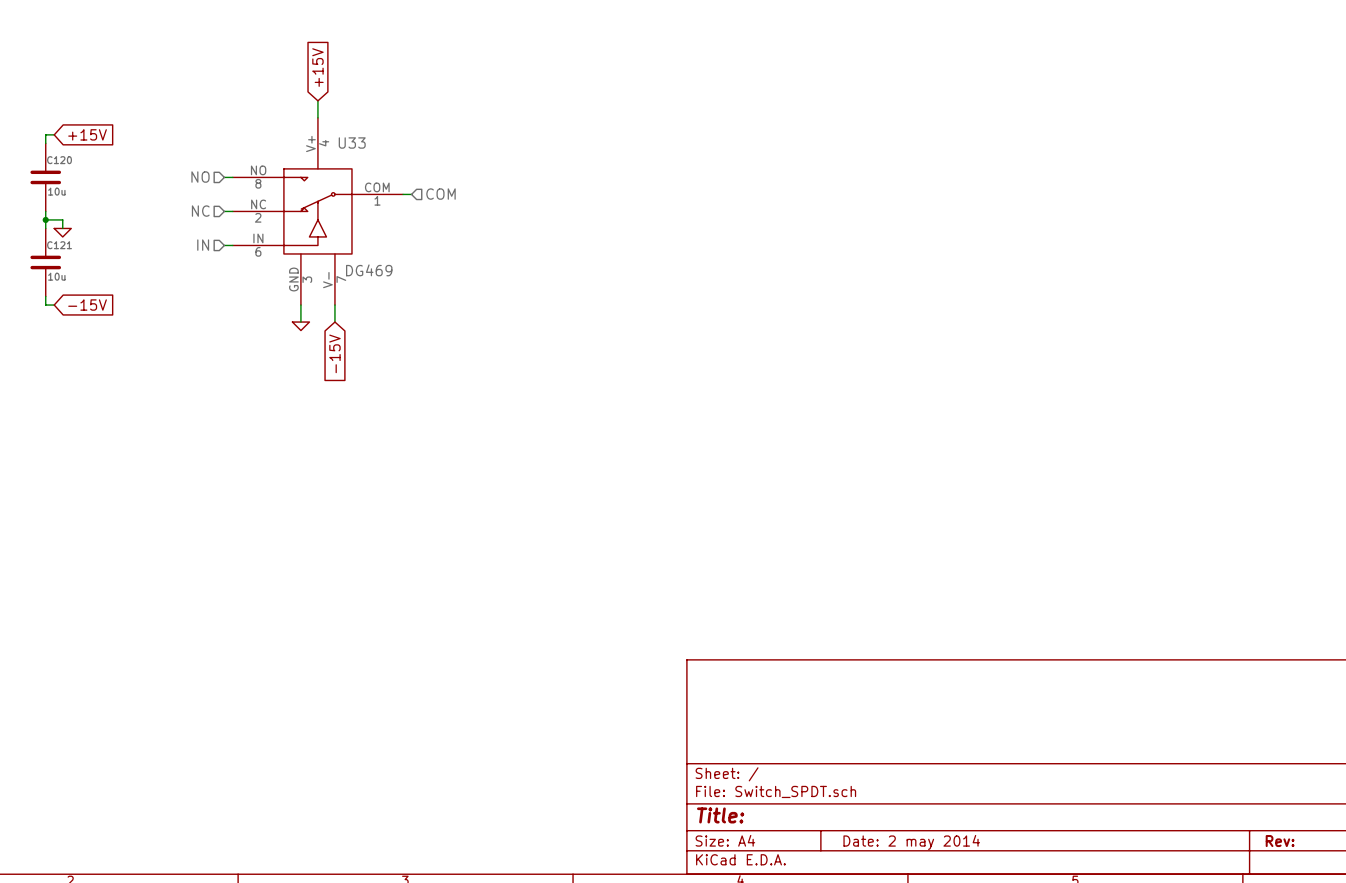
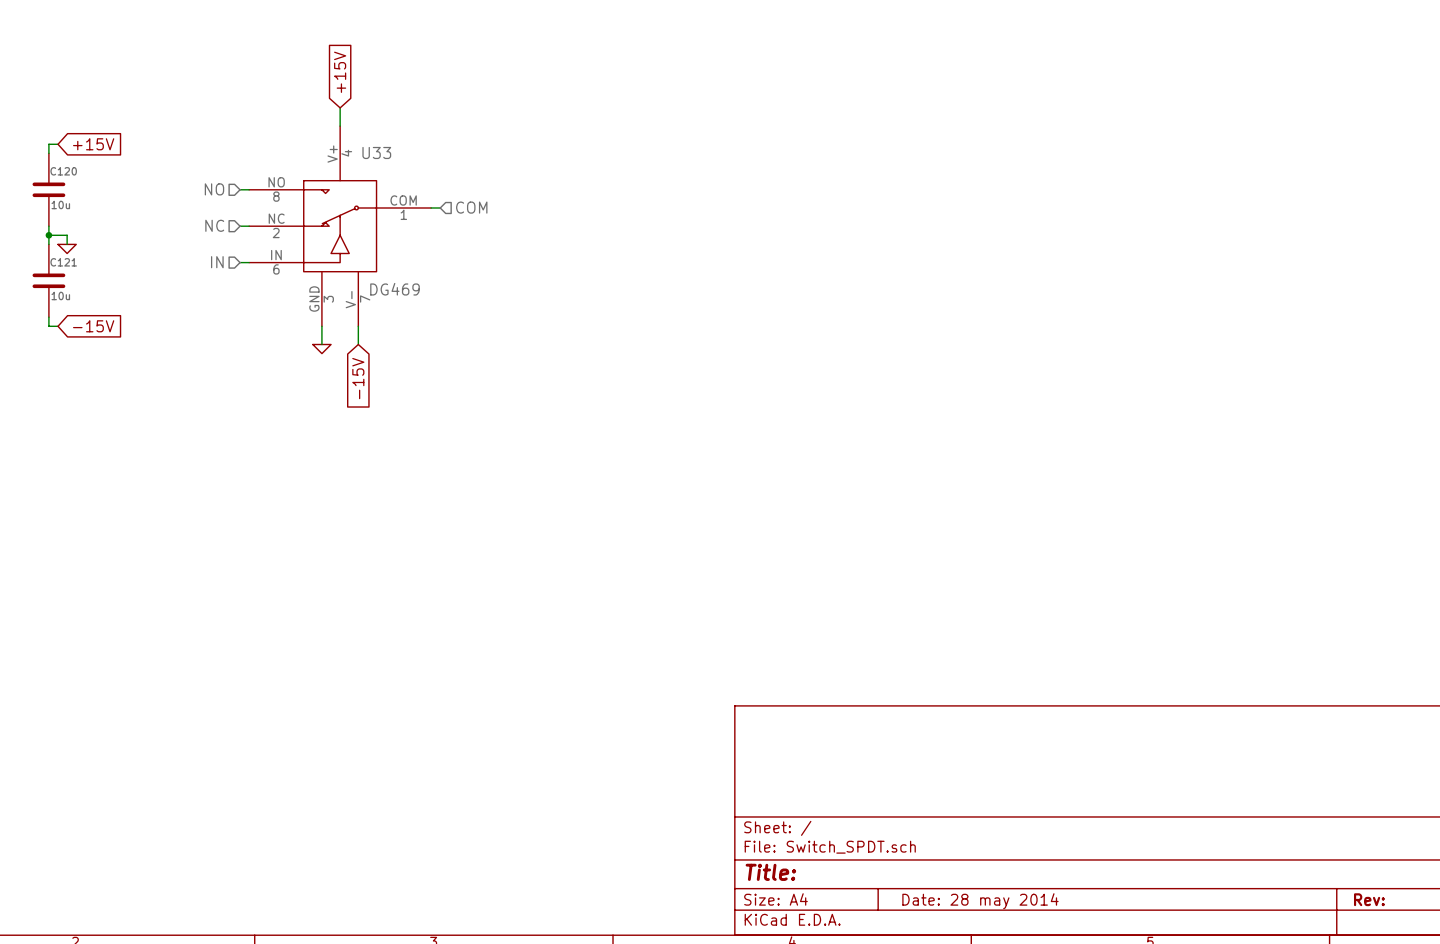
title block: Date: 2 may 2014 (911, 842) -> Date: 28 may 2014 (980, 901)

